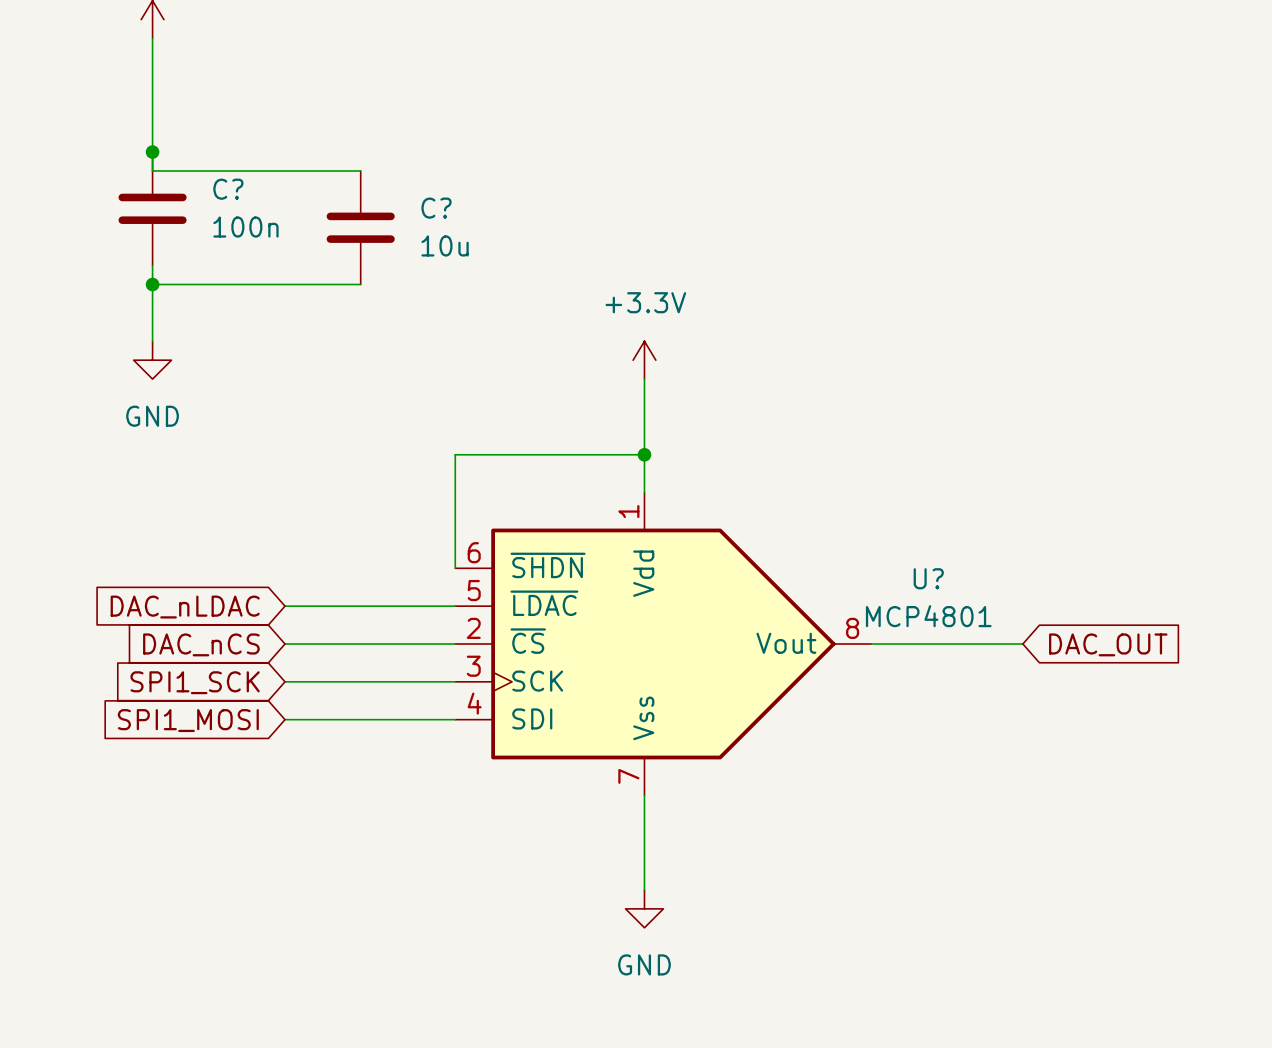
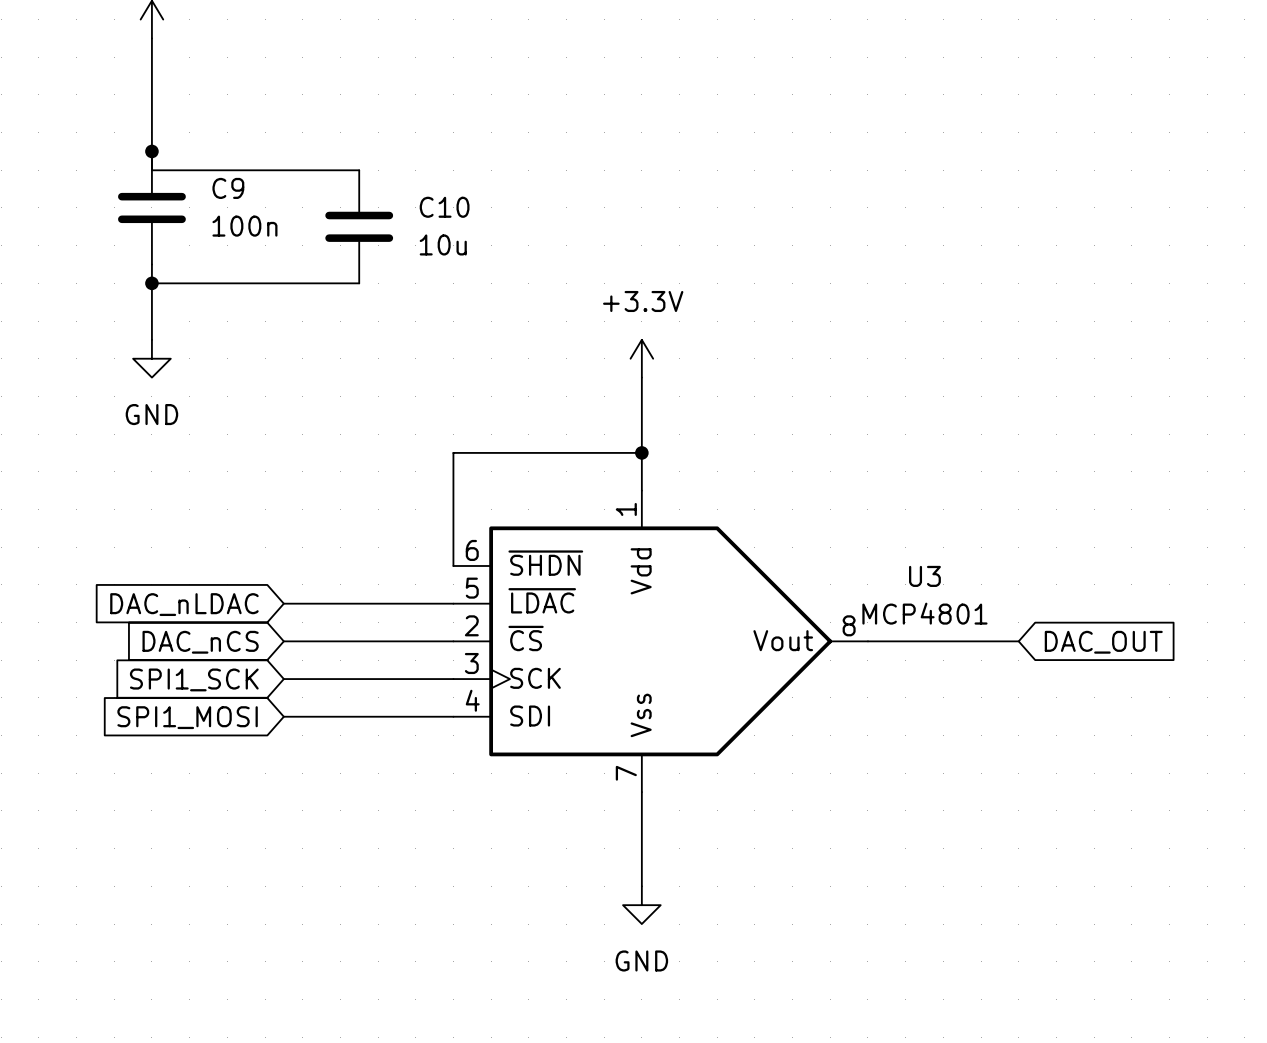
C? name: C? (228, 189) -> C9 (228, 188)
C? name: C? (436, 208) -> C10 (444, 207)
U? name: U? (928, 578) -> U3 (924, 576)

